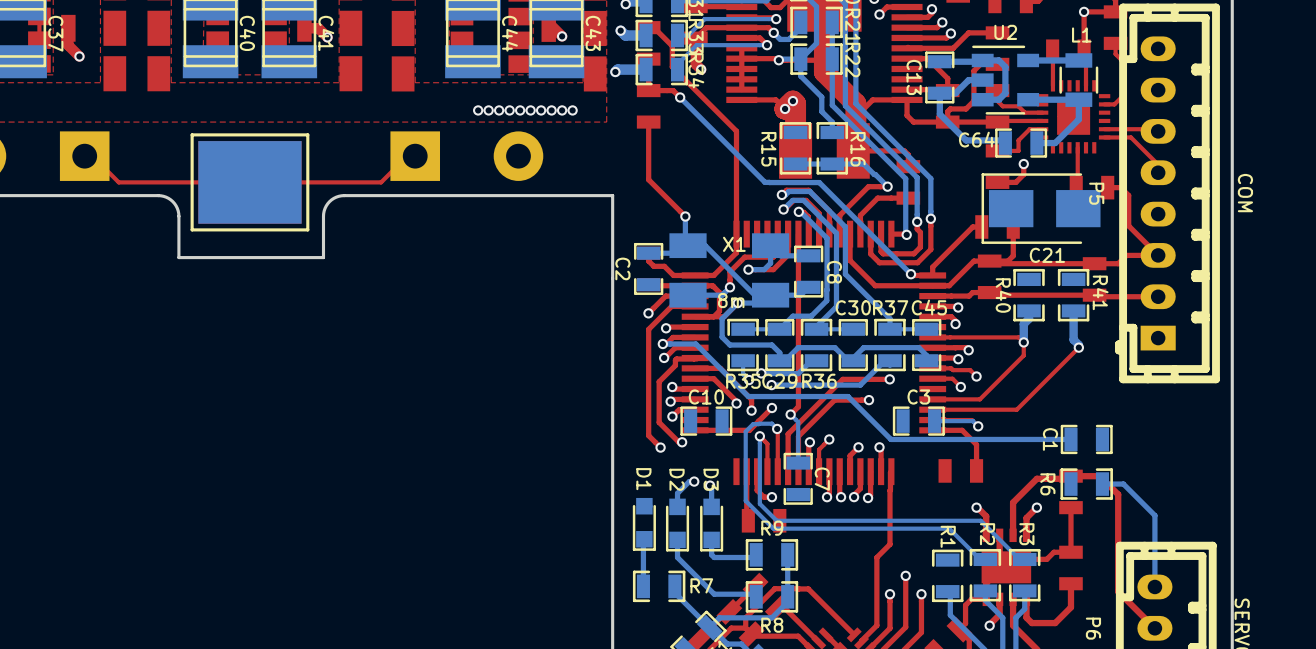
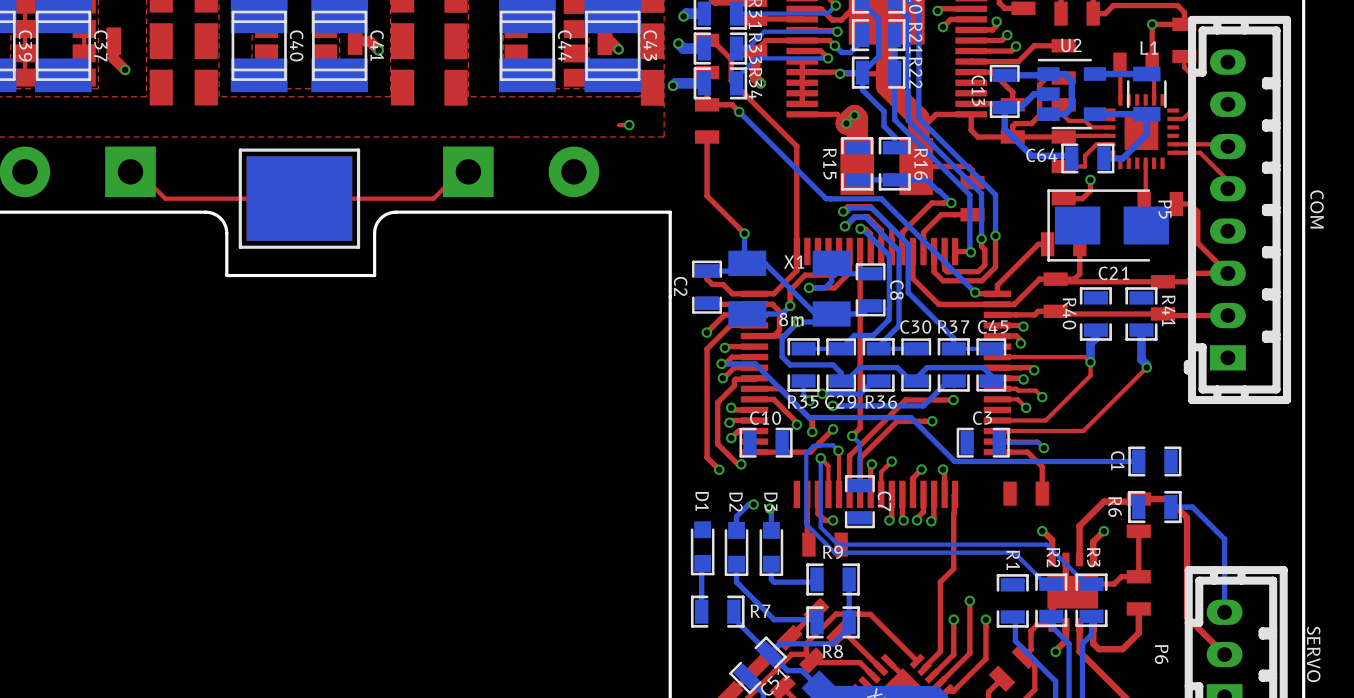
via: (478, 110) -> none
via: (488, 110) -> none
via: (499, 110) -> none
via: (509, 110) -> none
via: (520, 110) -> none
via: (530, 110) -> none
via: (541, 110) -> none
via: (551, 110) -> none
via: (562, 110) -> none
top track: none -> (629, 125) (619, 125)

